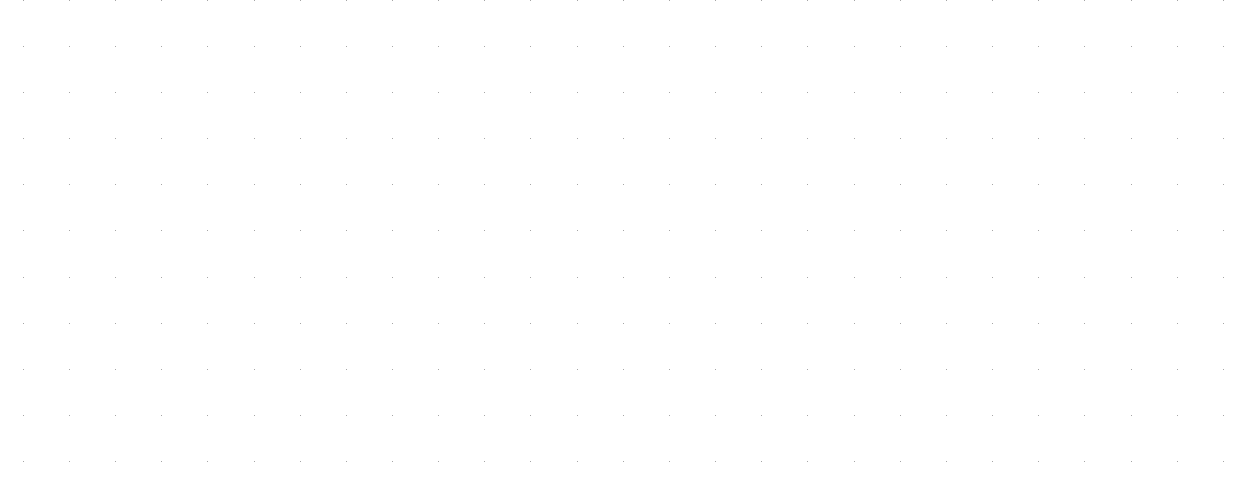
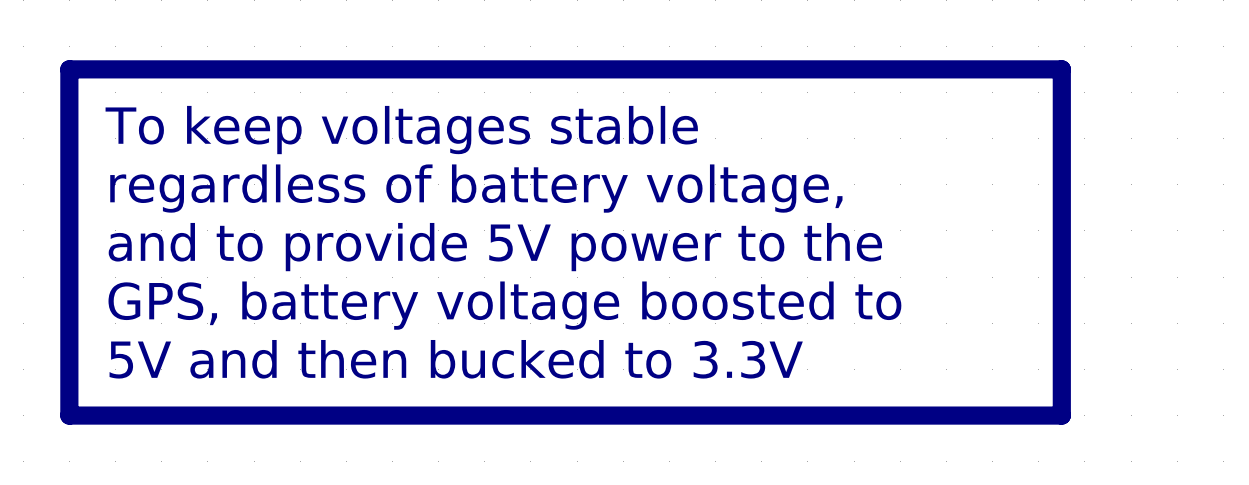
line: none -> (69, 69) (1061, 69) (1061, 415) (69, 415) (69, 69)
text: none -> To keep voltages stable (401, 130)
text: none -> regardless of battery voltage, (476, 188)
text: none -> and to provide 5V power to the (495, 247)
text: none -> GPS, battery voltage boosted to (504, 305)
text: none -> 5V and then bucked to 3.3V (456, 359)

